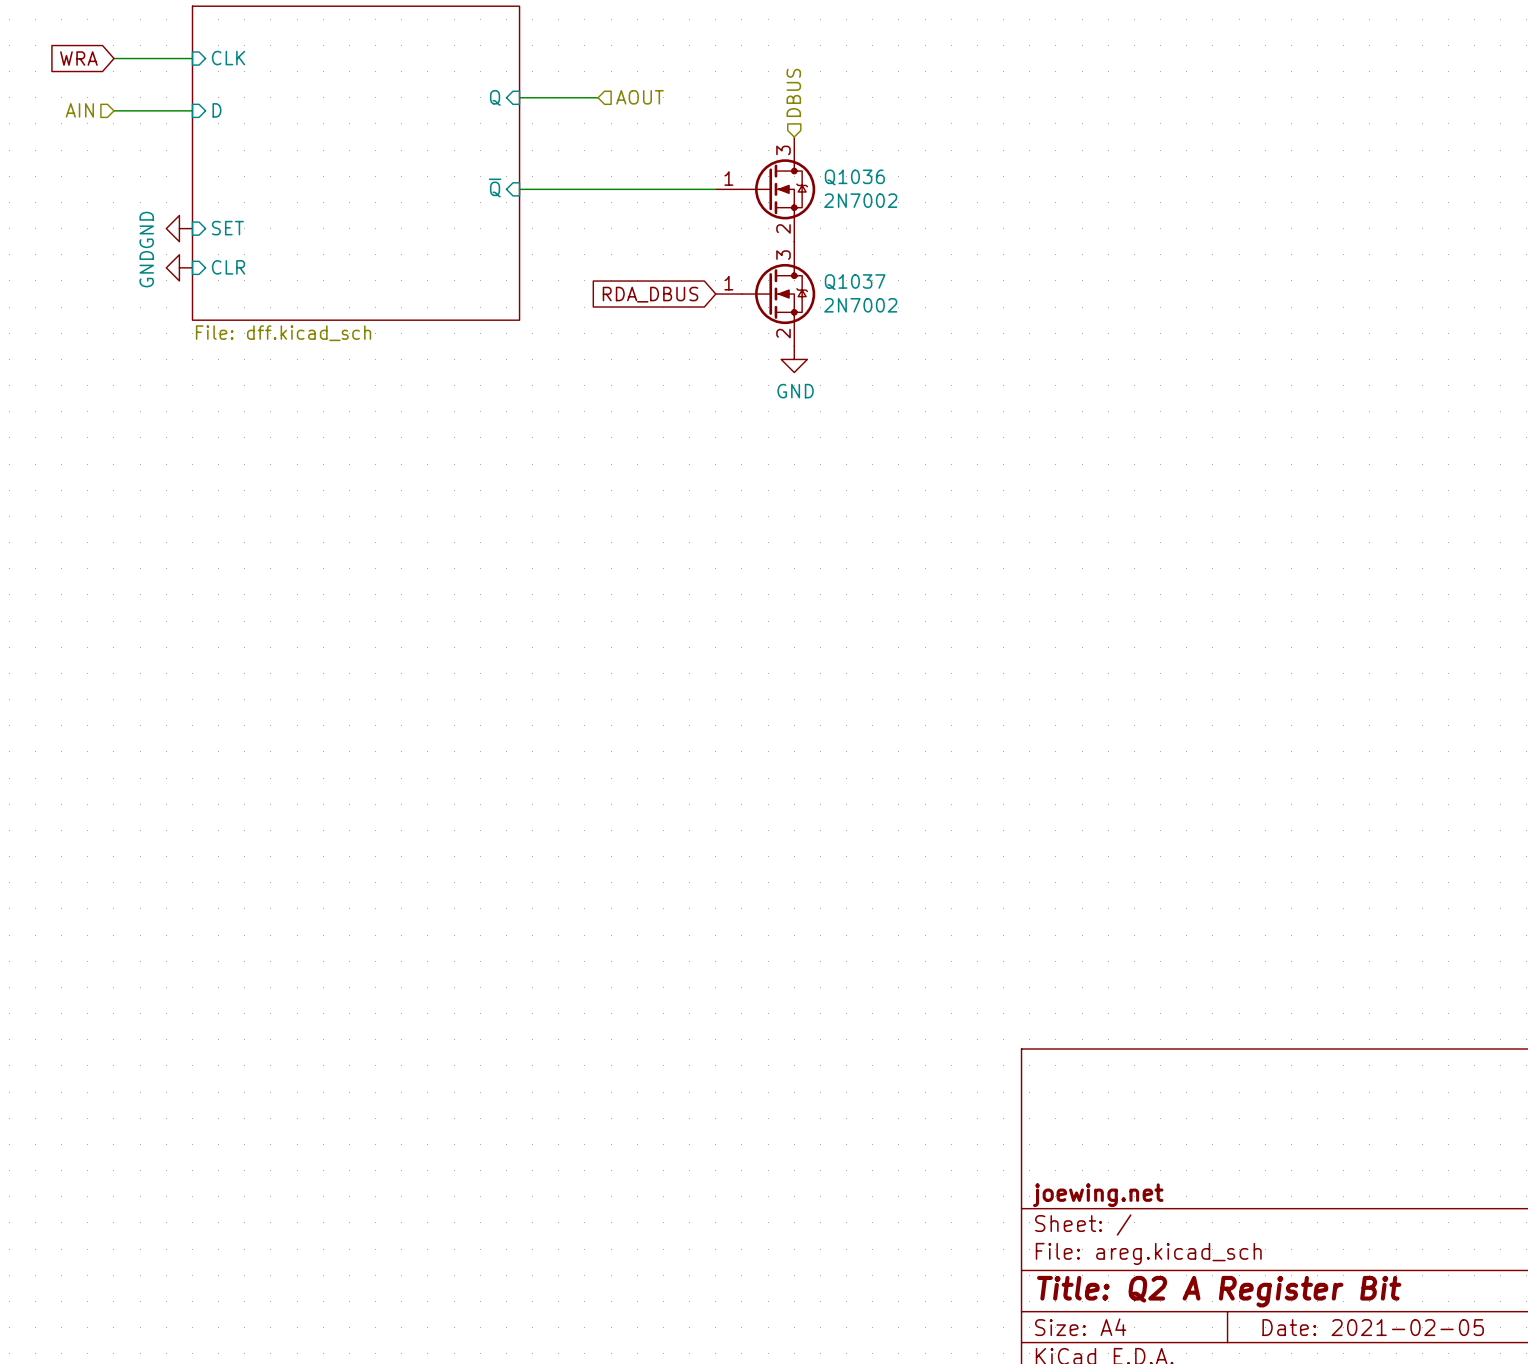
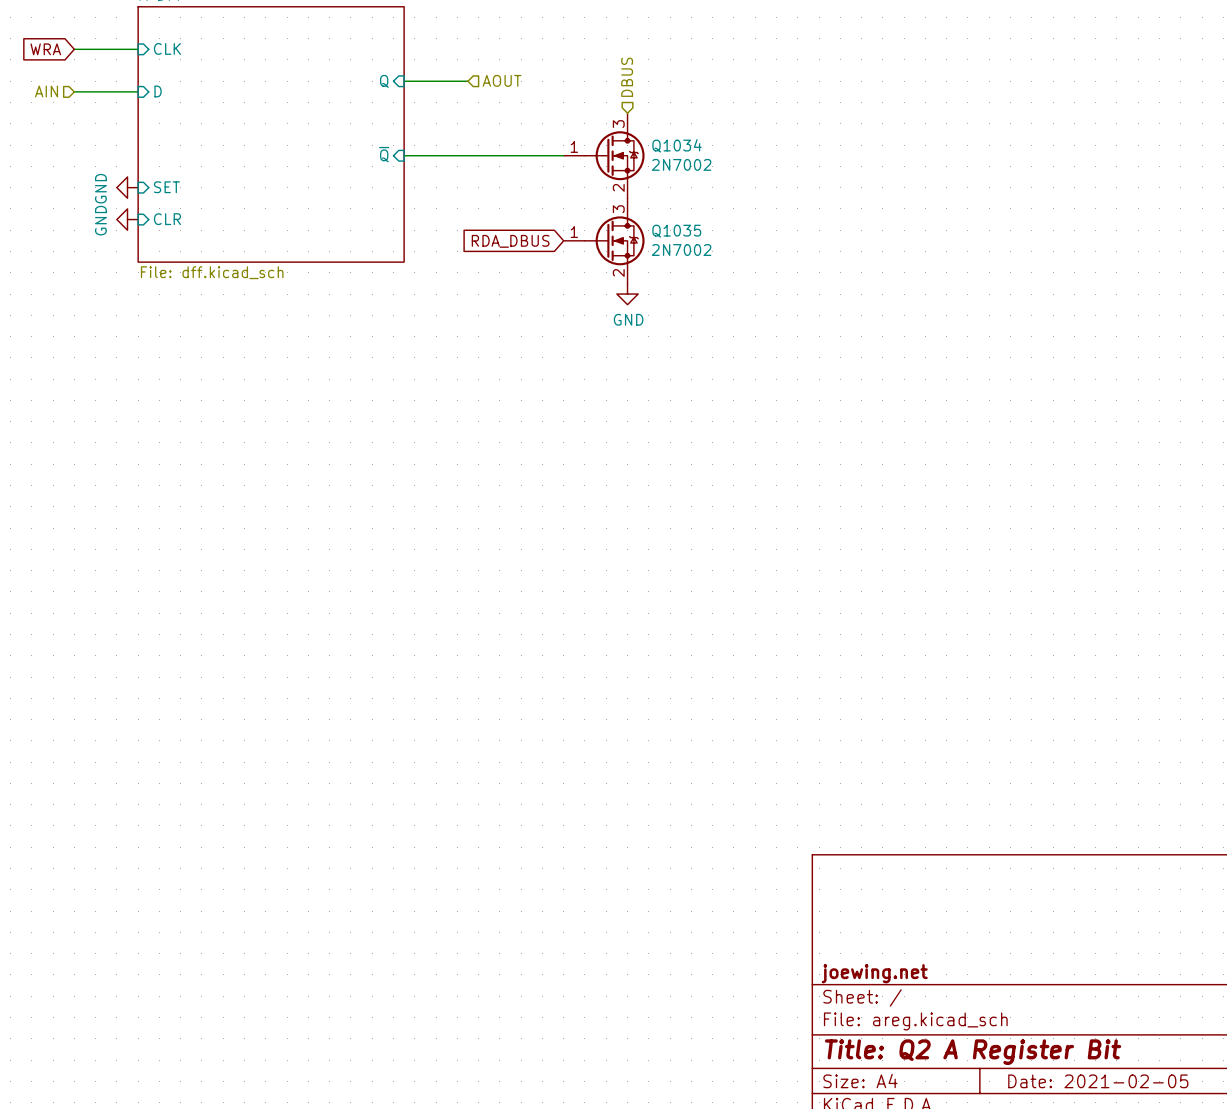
Q1036 name: Q1036 (854, 177) -> Q1034 (677, 145)
Q1037 name: Q1037 (855, 282) -> Q1035 (676, 231)

